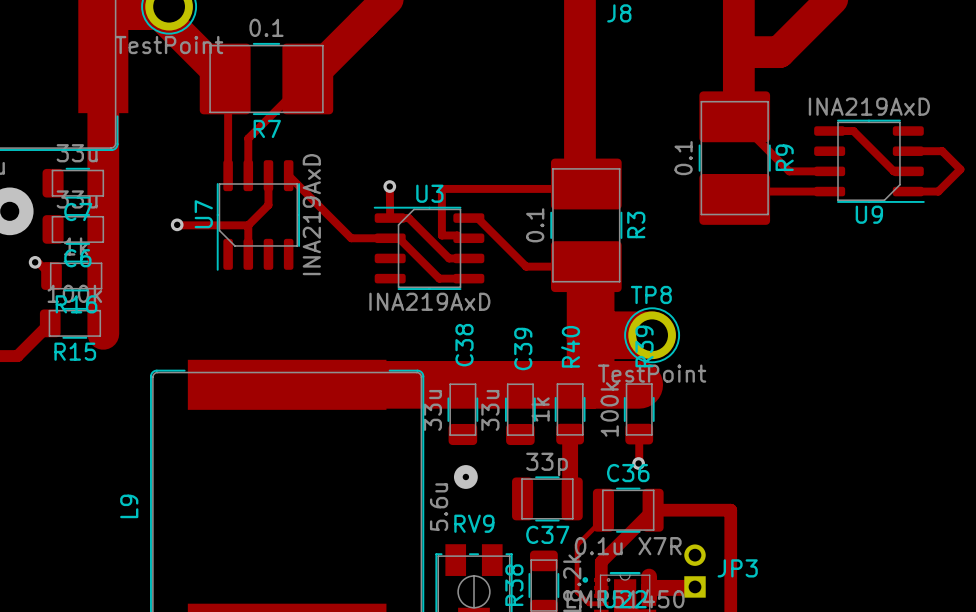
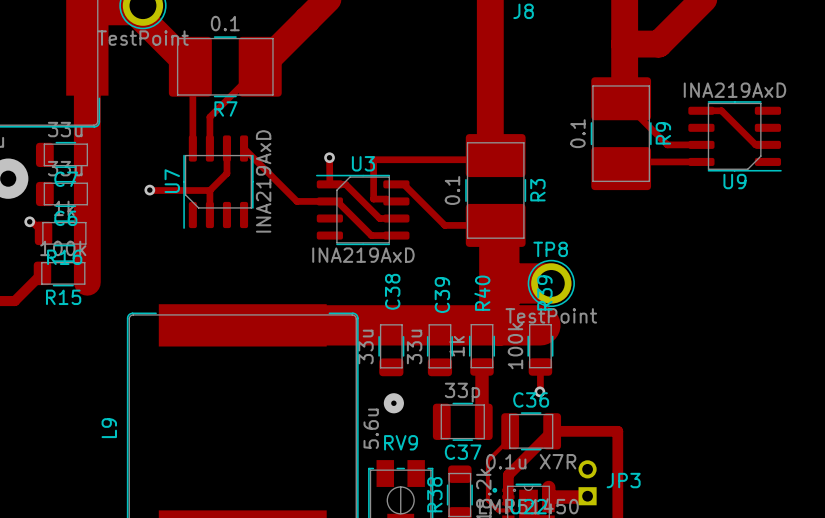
top track: (908, 151) (942, 151) (960, 169) (938, 191) (908, 191) -> none

